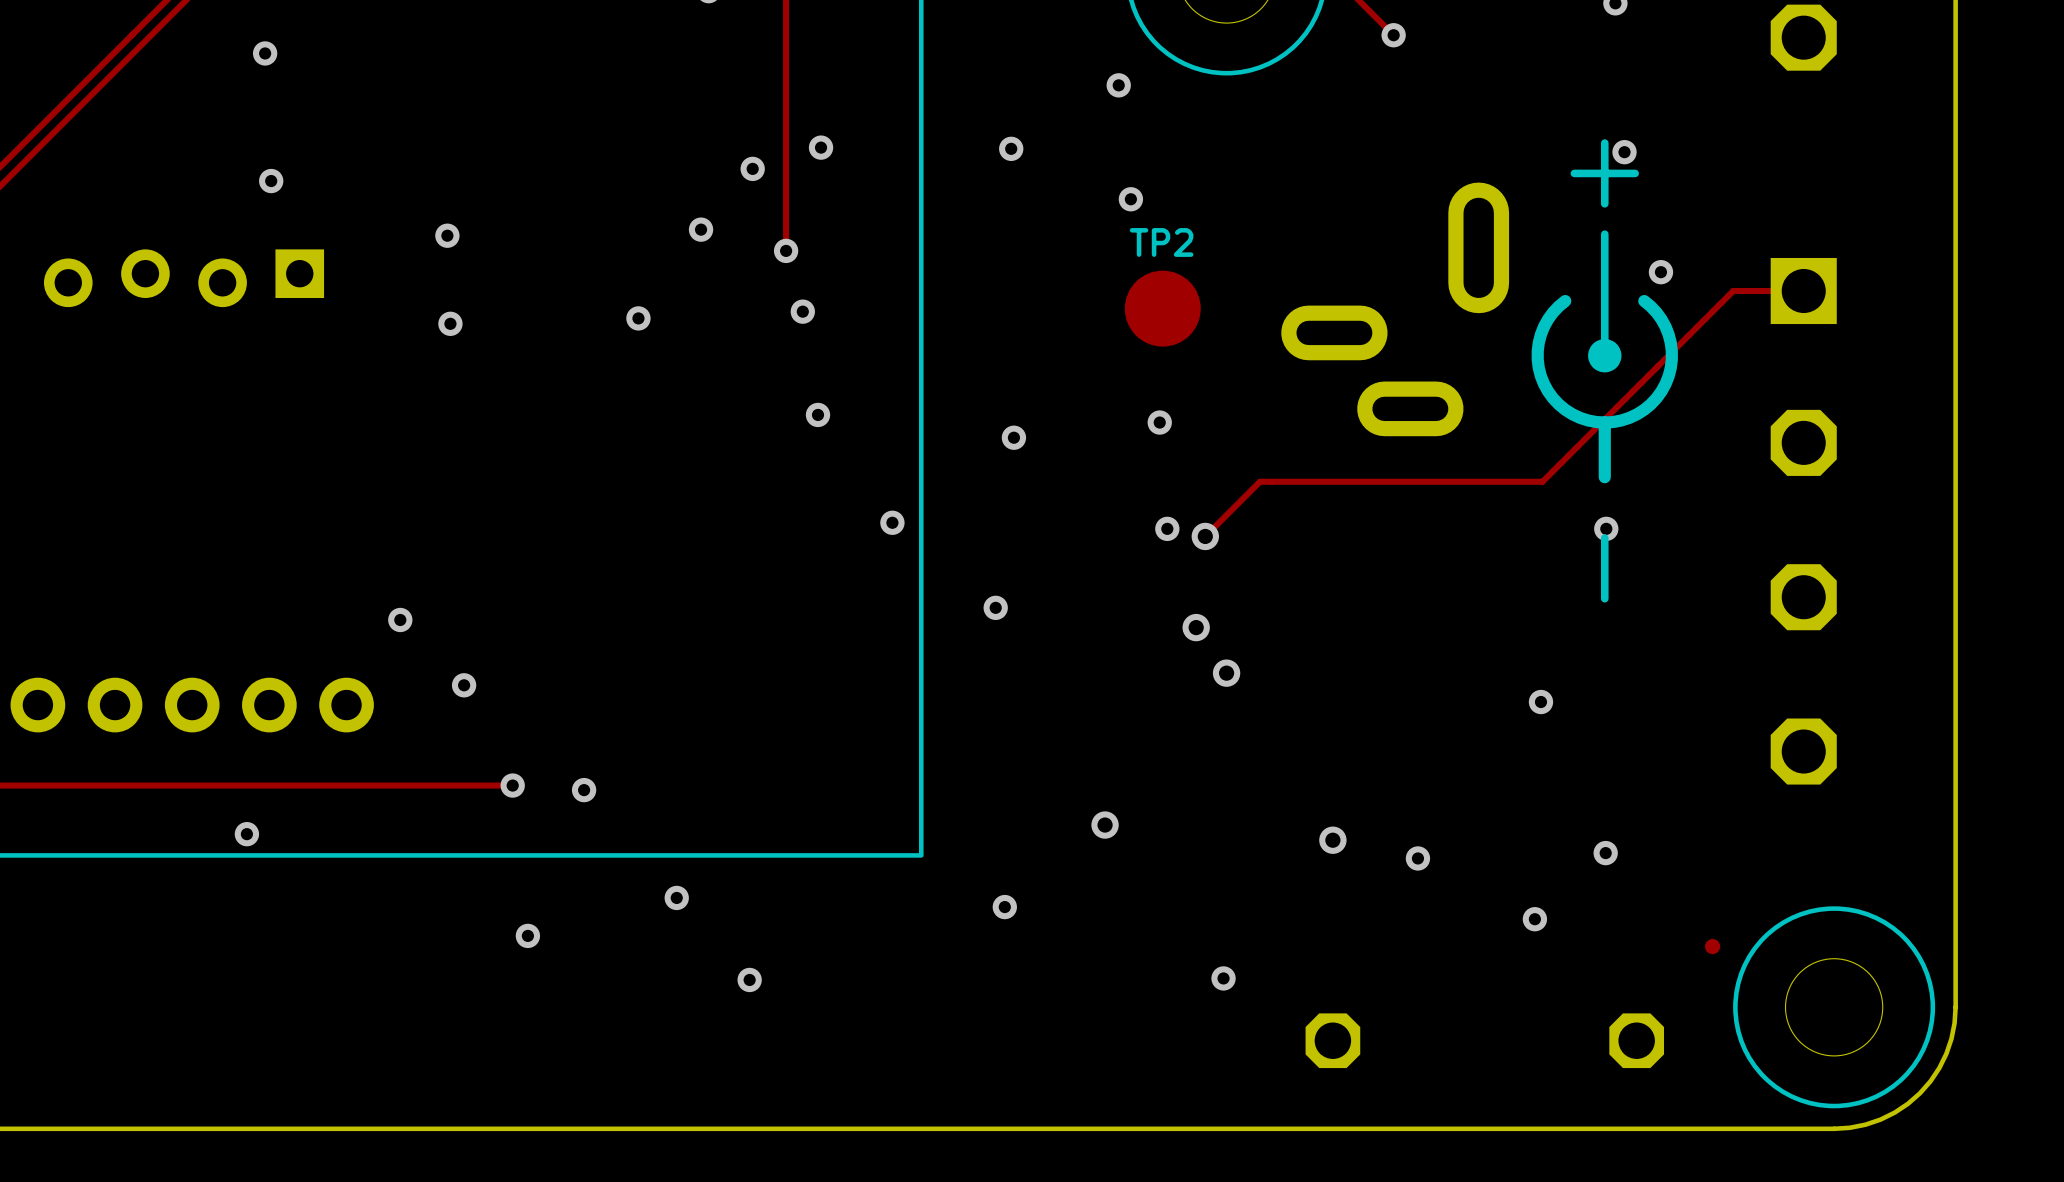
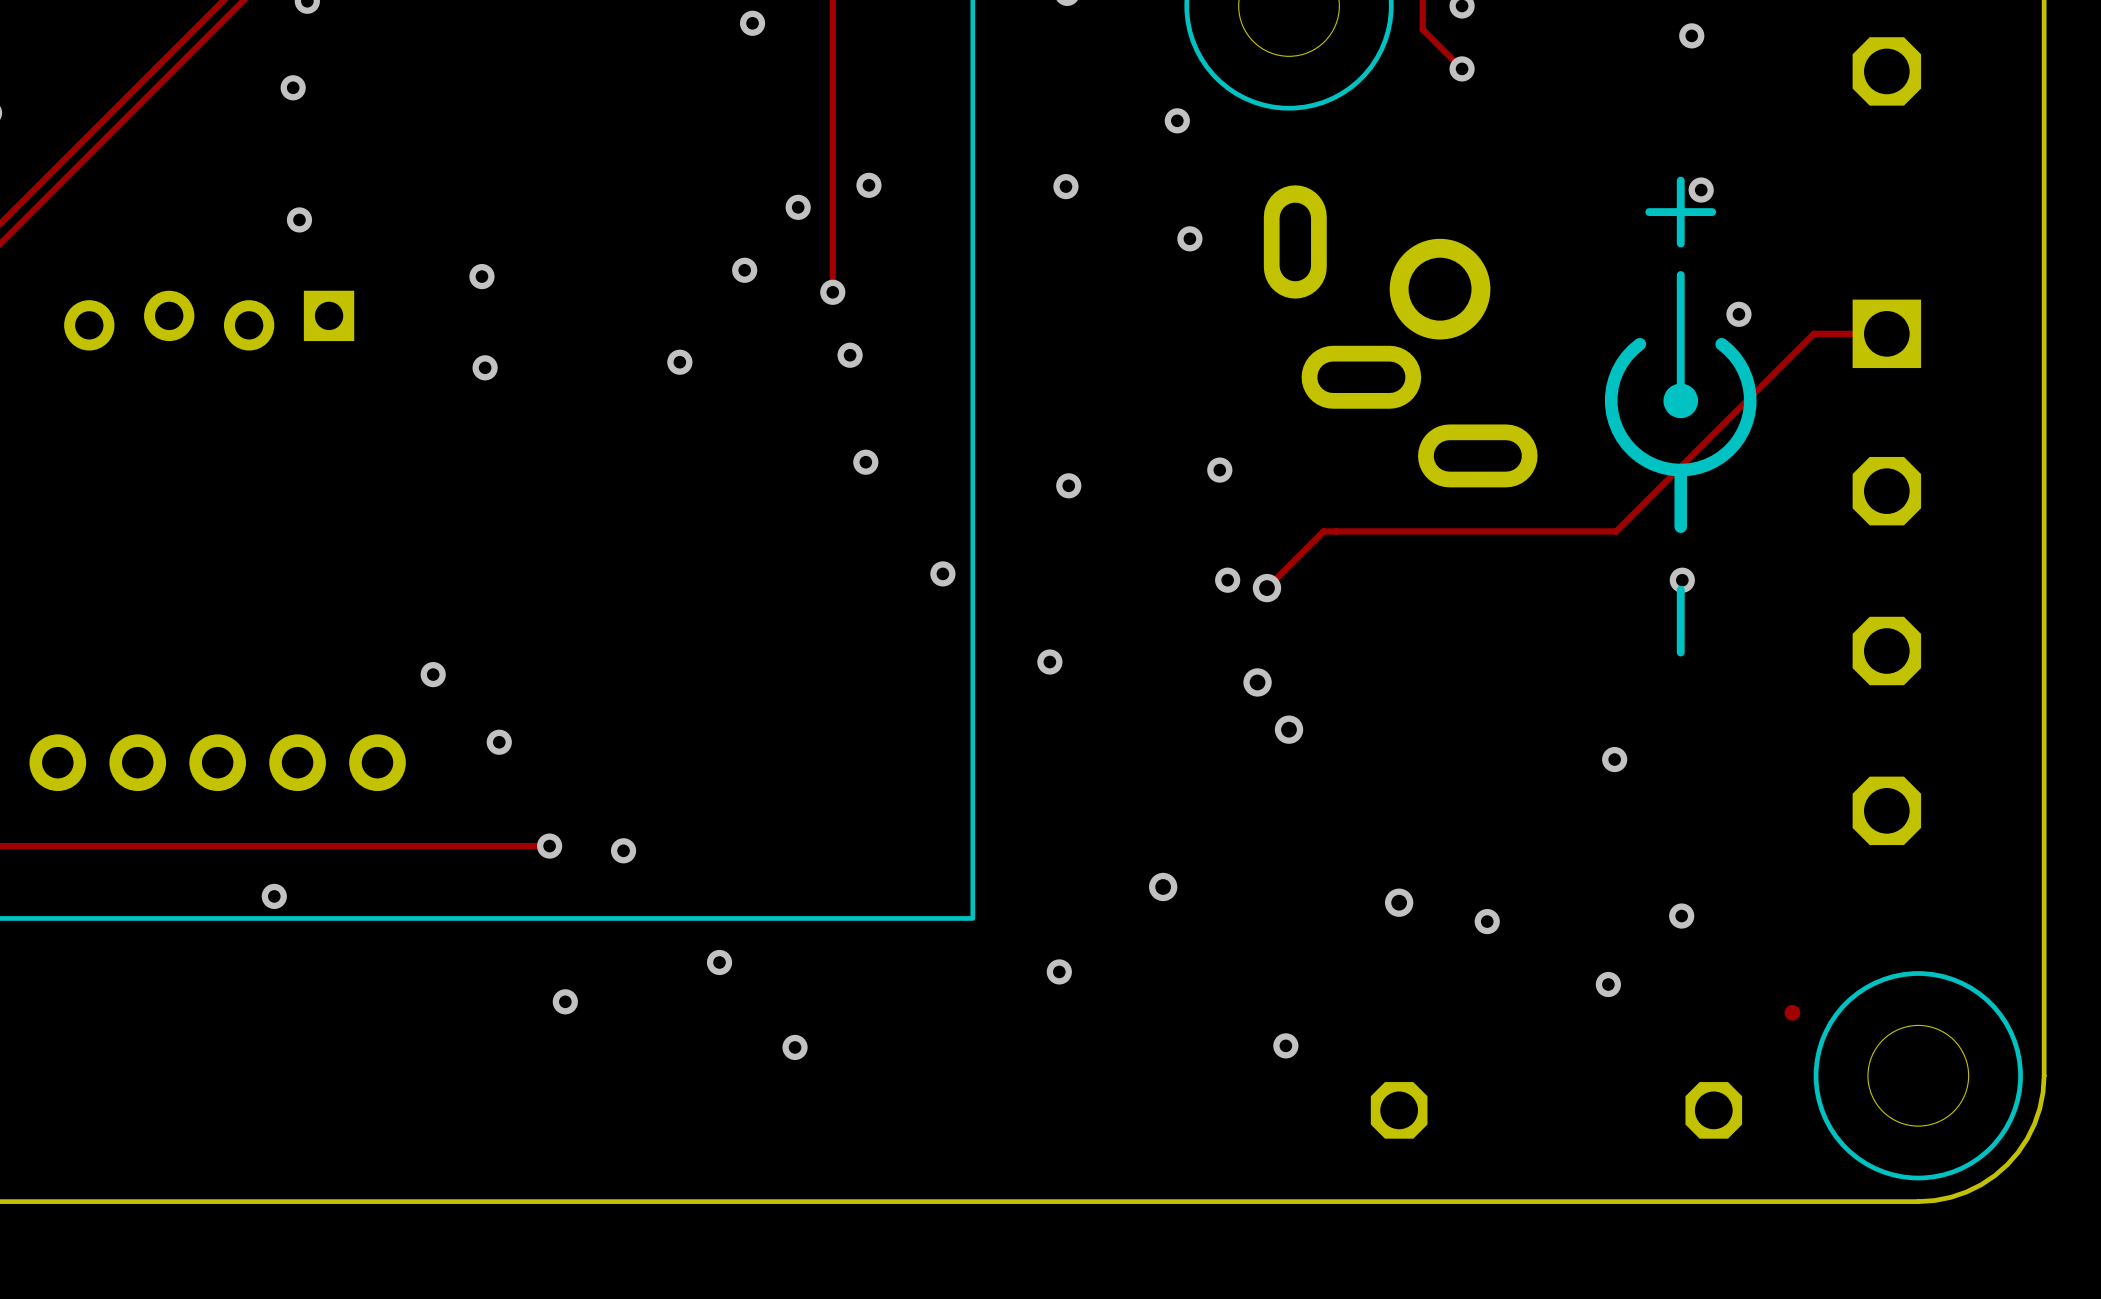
part: none -> (1400, 336)
TP2: (1162, 308) -> none
part: (1395, 309) -> none

